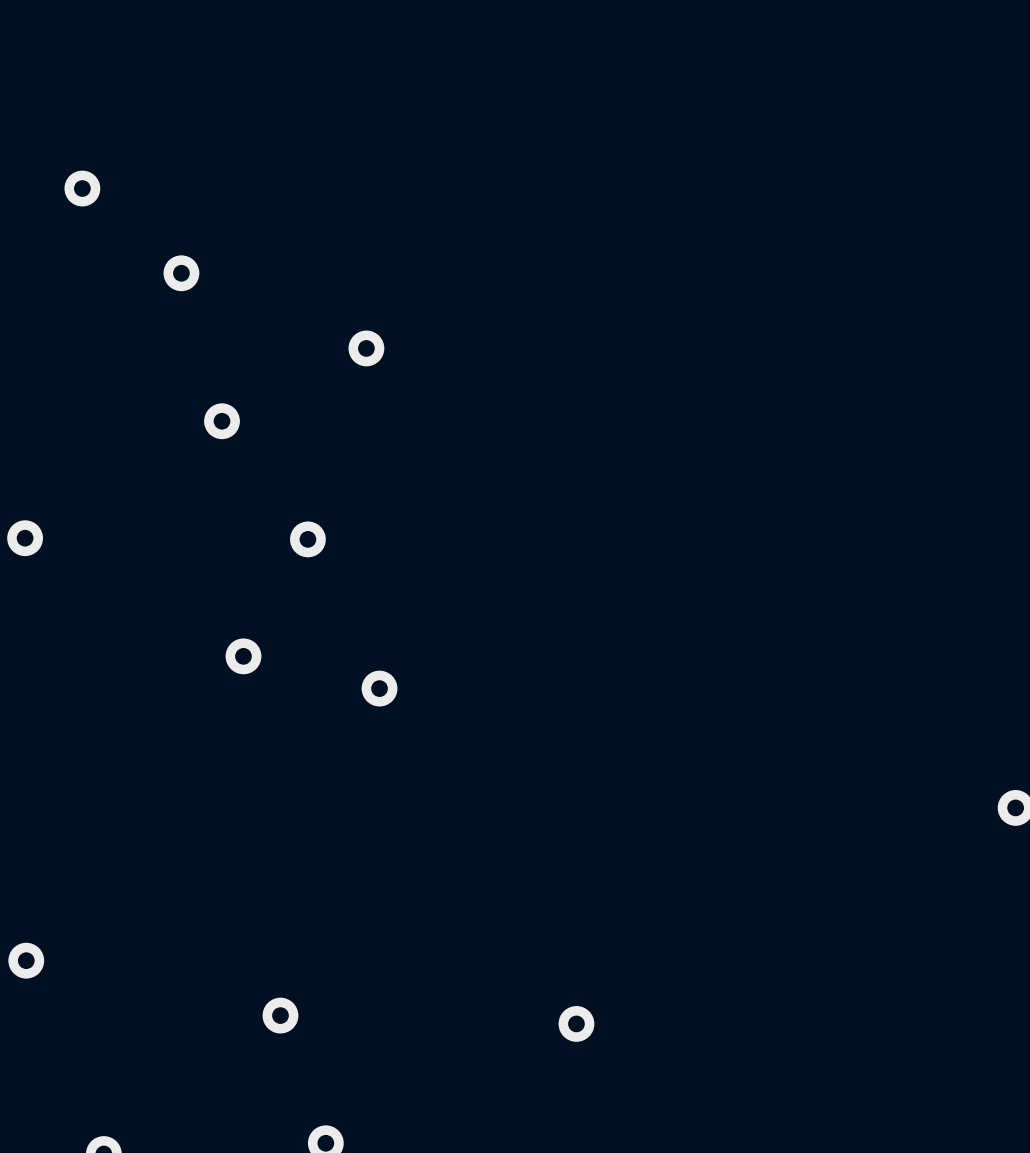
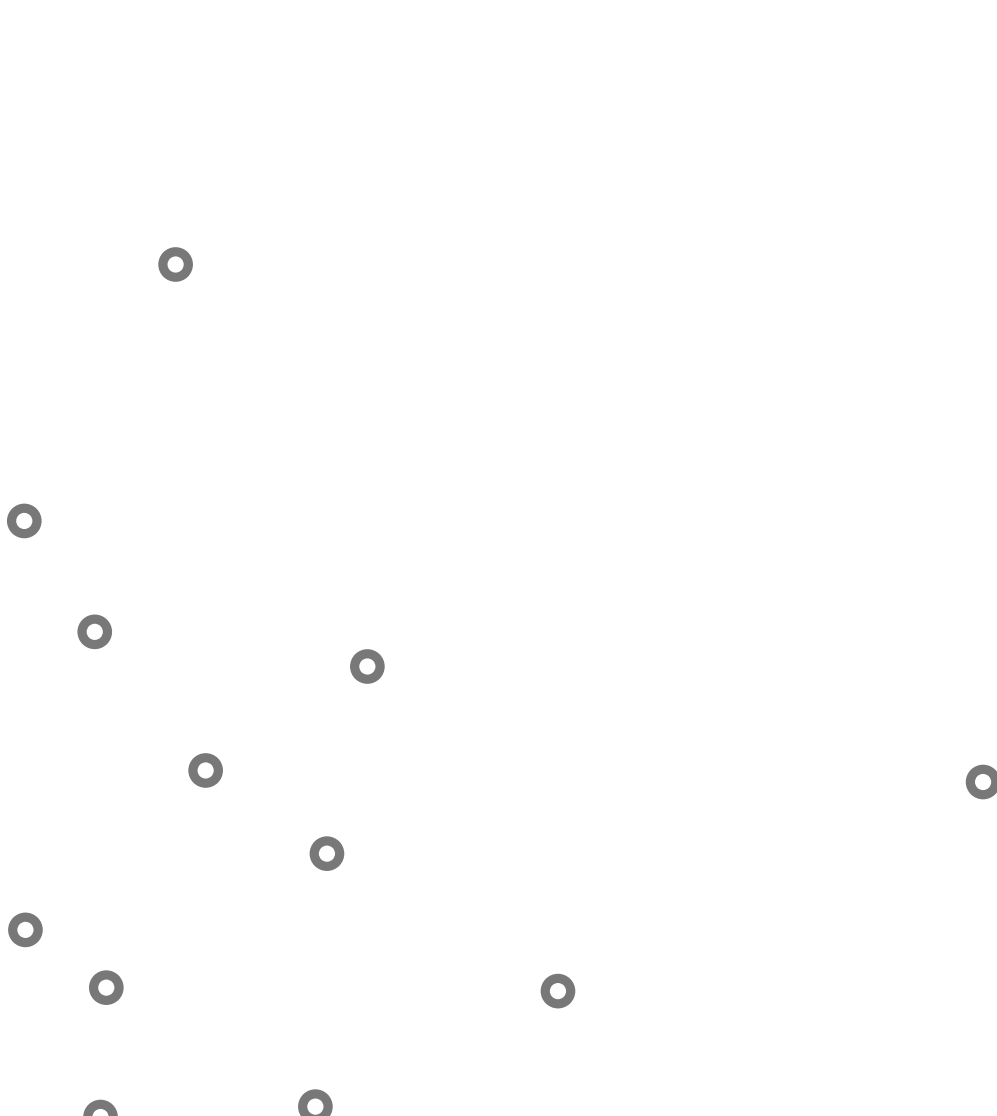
via: (82, 188) -> none
via: (366, 348) -> none
via: (222, 421) -> none
via: (307, 539) -> none
via: none -> (94, 631)
via: (243, 656) -> none
via: none -> (205, 770)
via: none -> (326, 853)
via: (280, 1015) -> none
via: none -> (106, 987)

